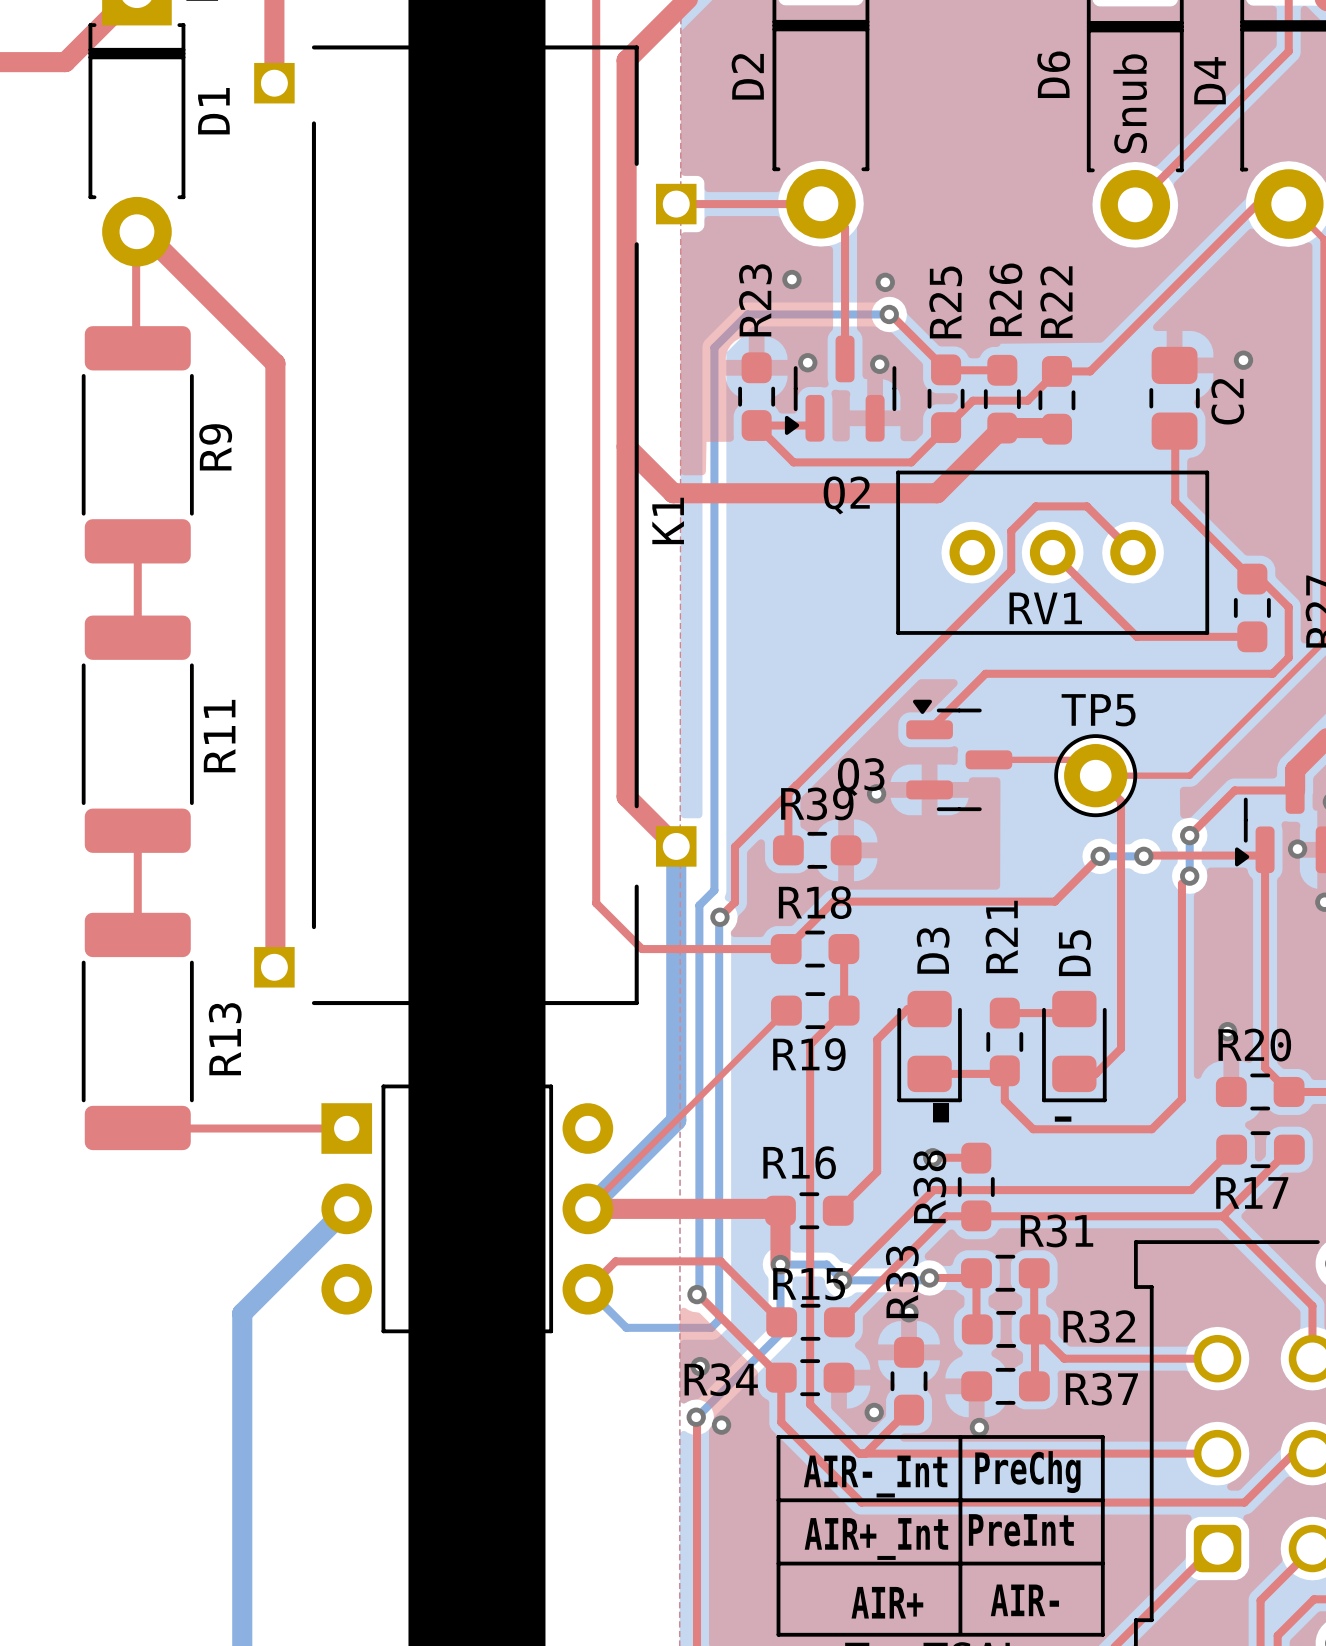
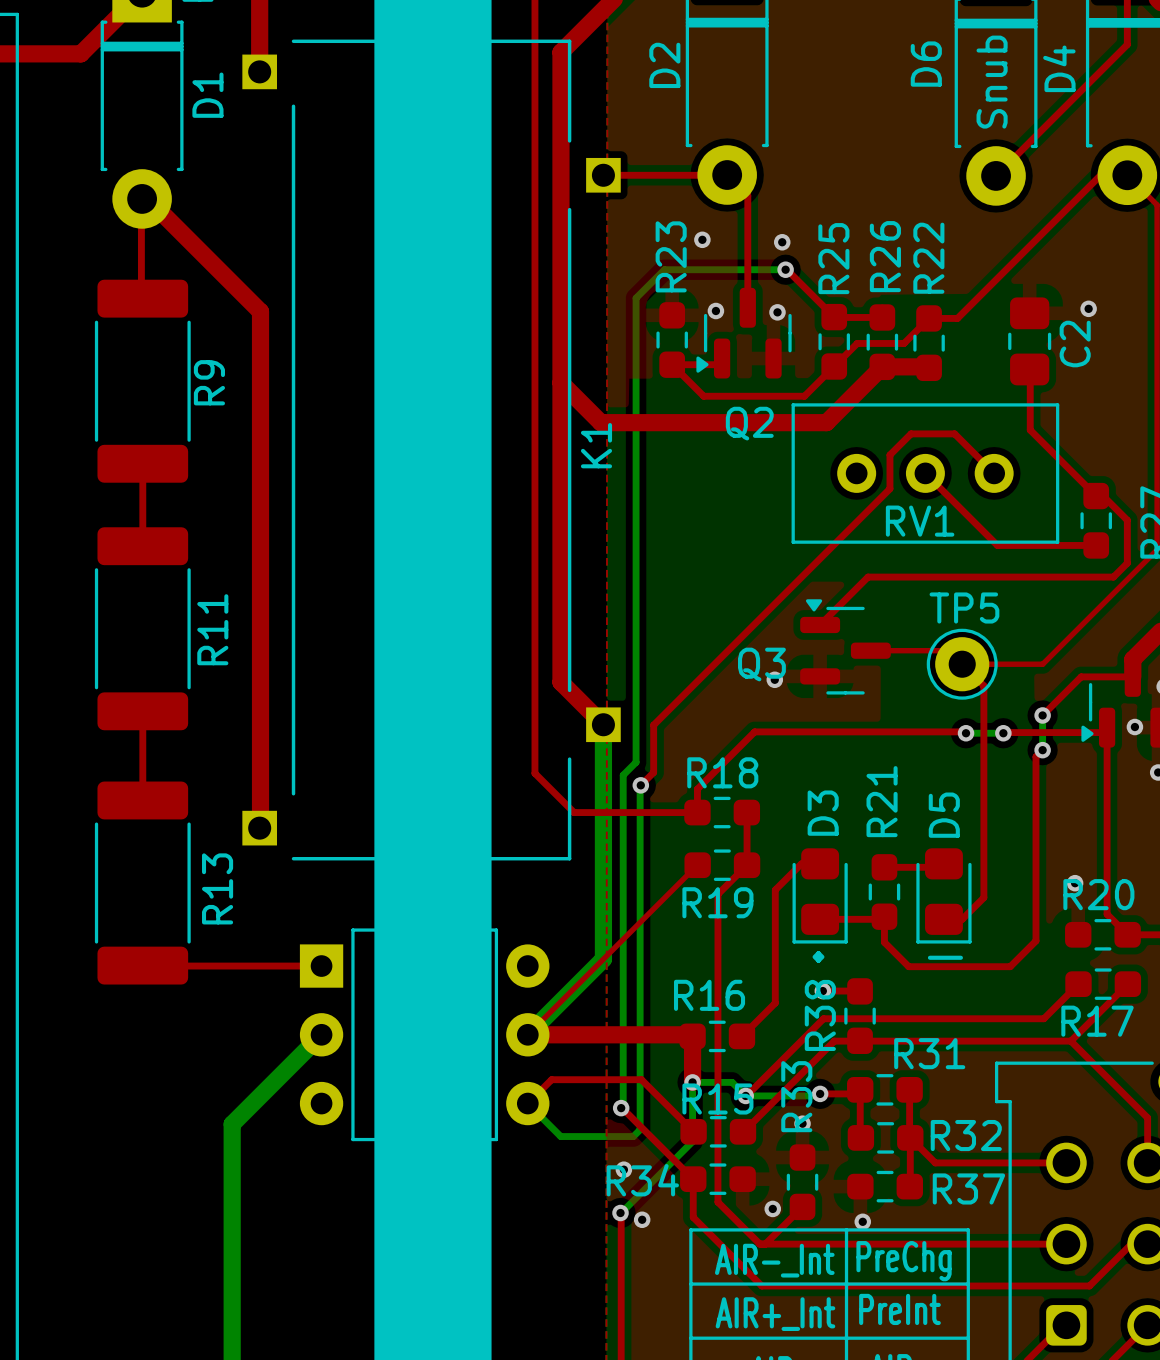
top track: (788, 793) (788, 850) (786, 850) -> none
R39: (817, 850) -> none
top track: (1100, 856) (1054, 901) (833, 901) (786, 949) -> (966, 733) (754, 731) (697, 789) (697, 812)

